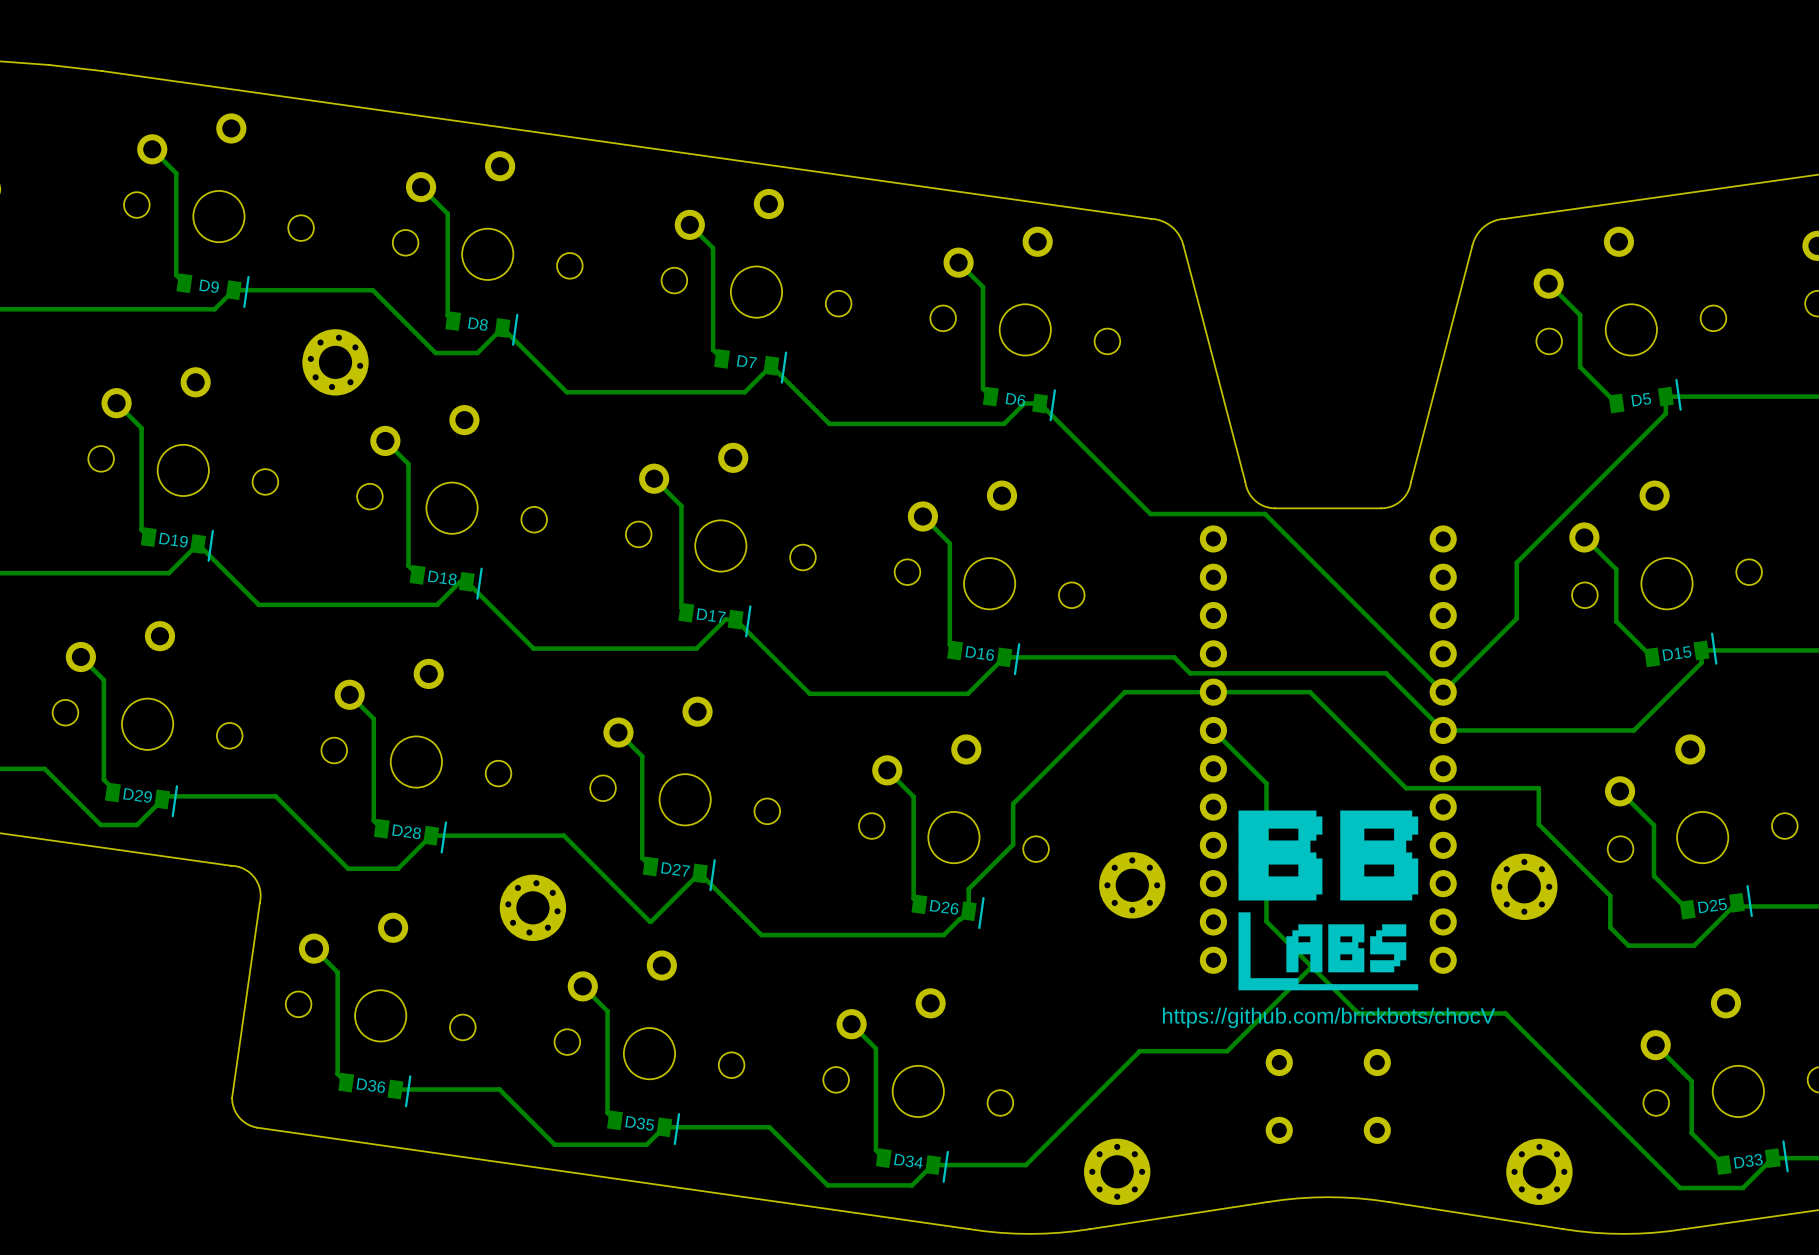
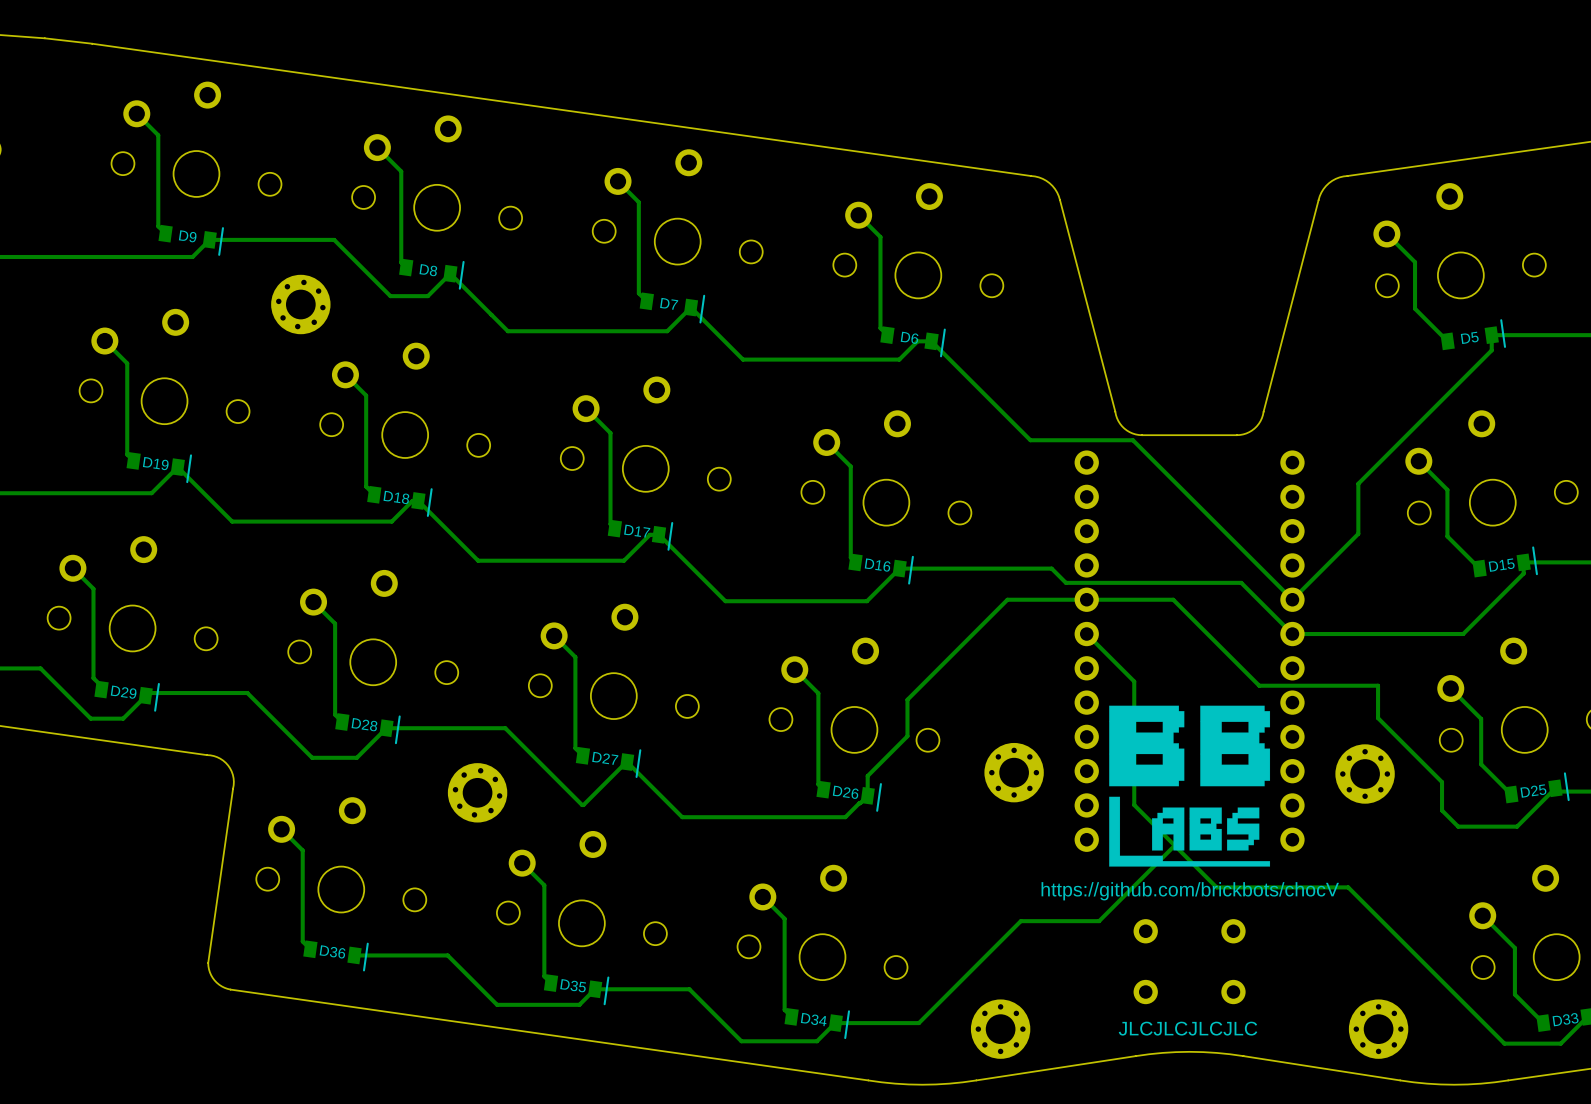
text: none -> JLCJLCJLCJLC (1188, 1028)

